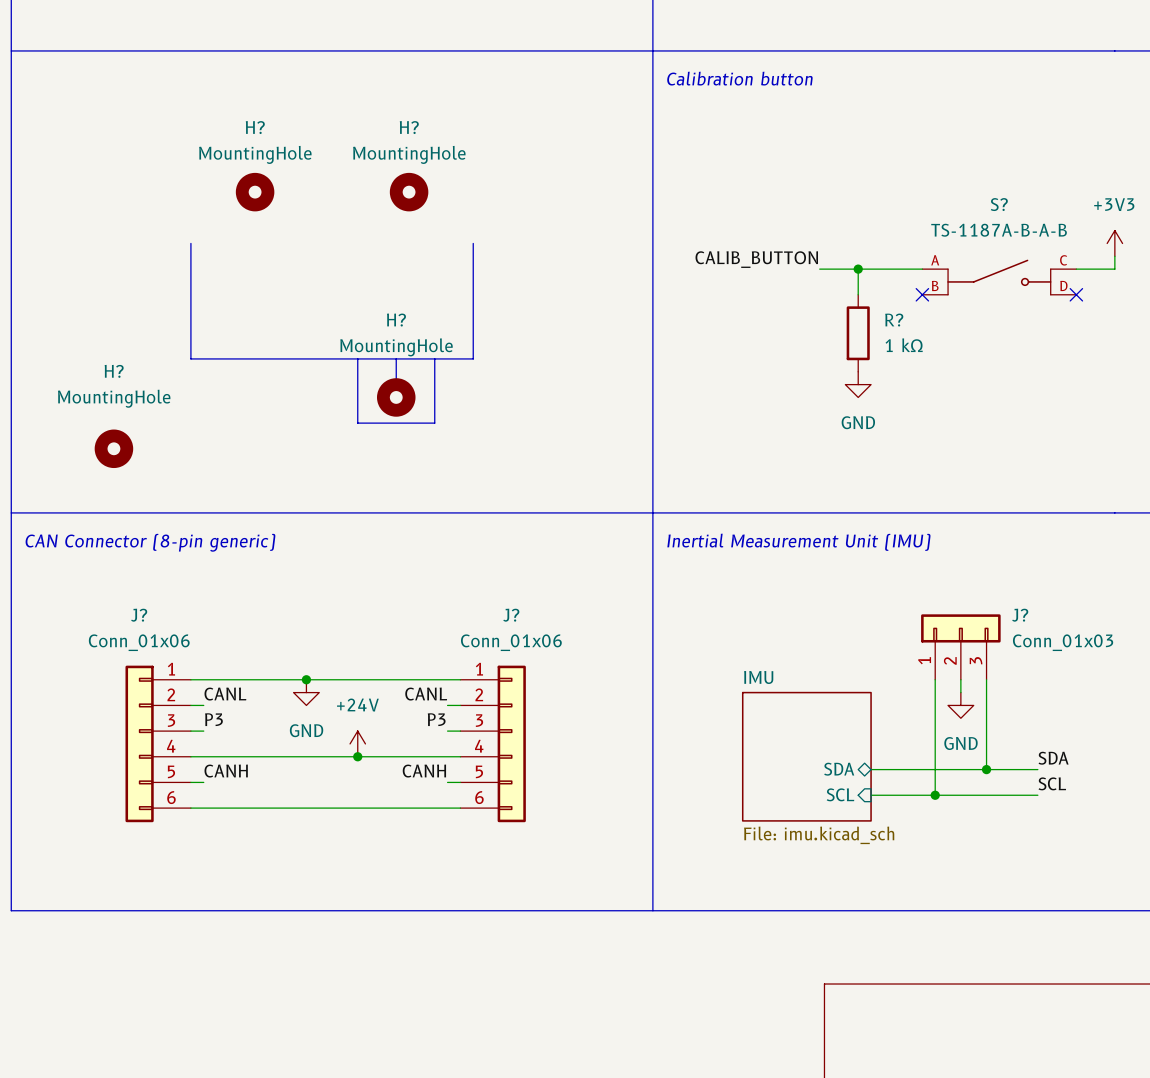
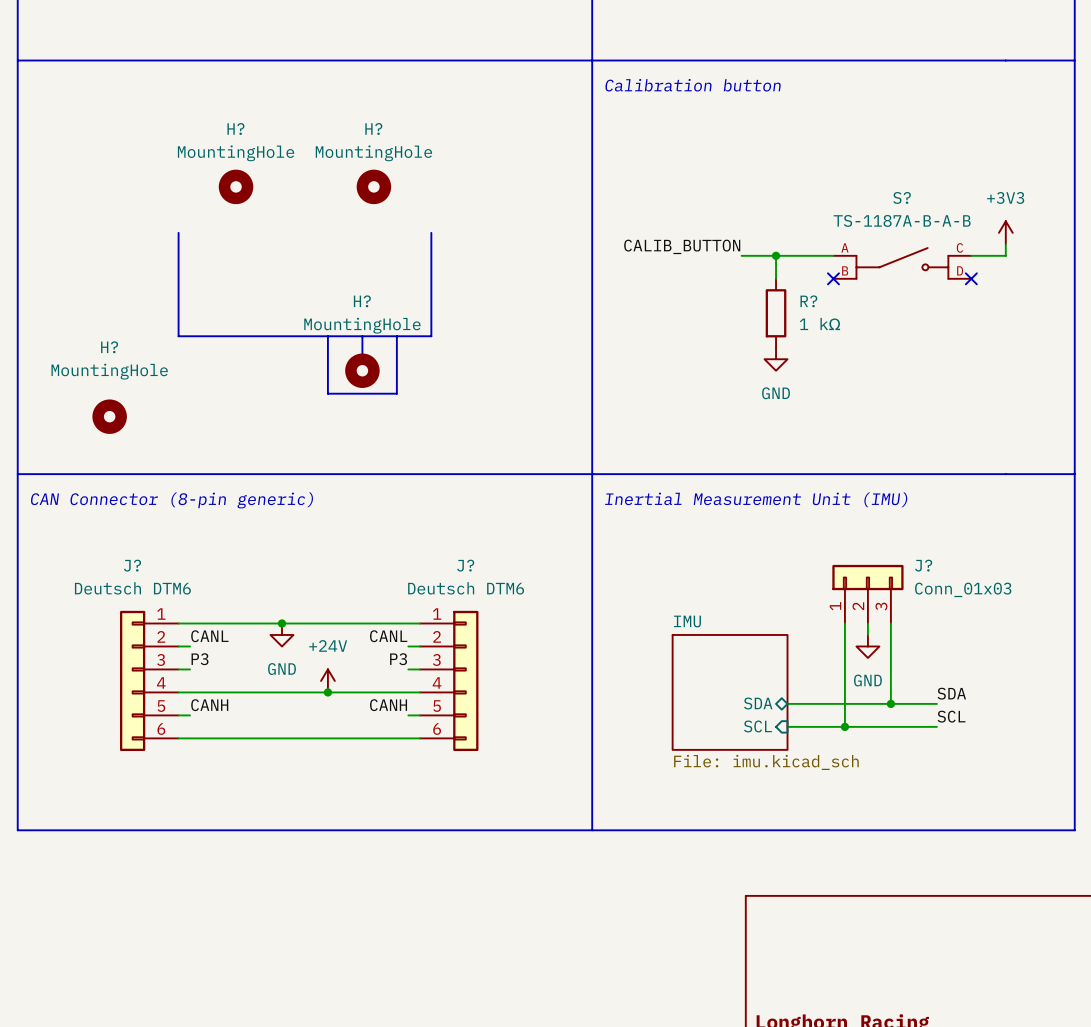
J? value: Conn_01x06 (139, 642) -> Deutsch DTM6 (132, 588)
J? value: Conn_01x06 (511, 642) -> Deutsch DTM6 (466, 588)

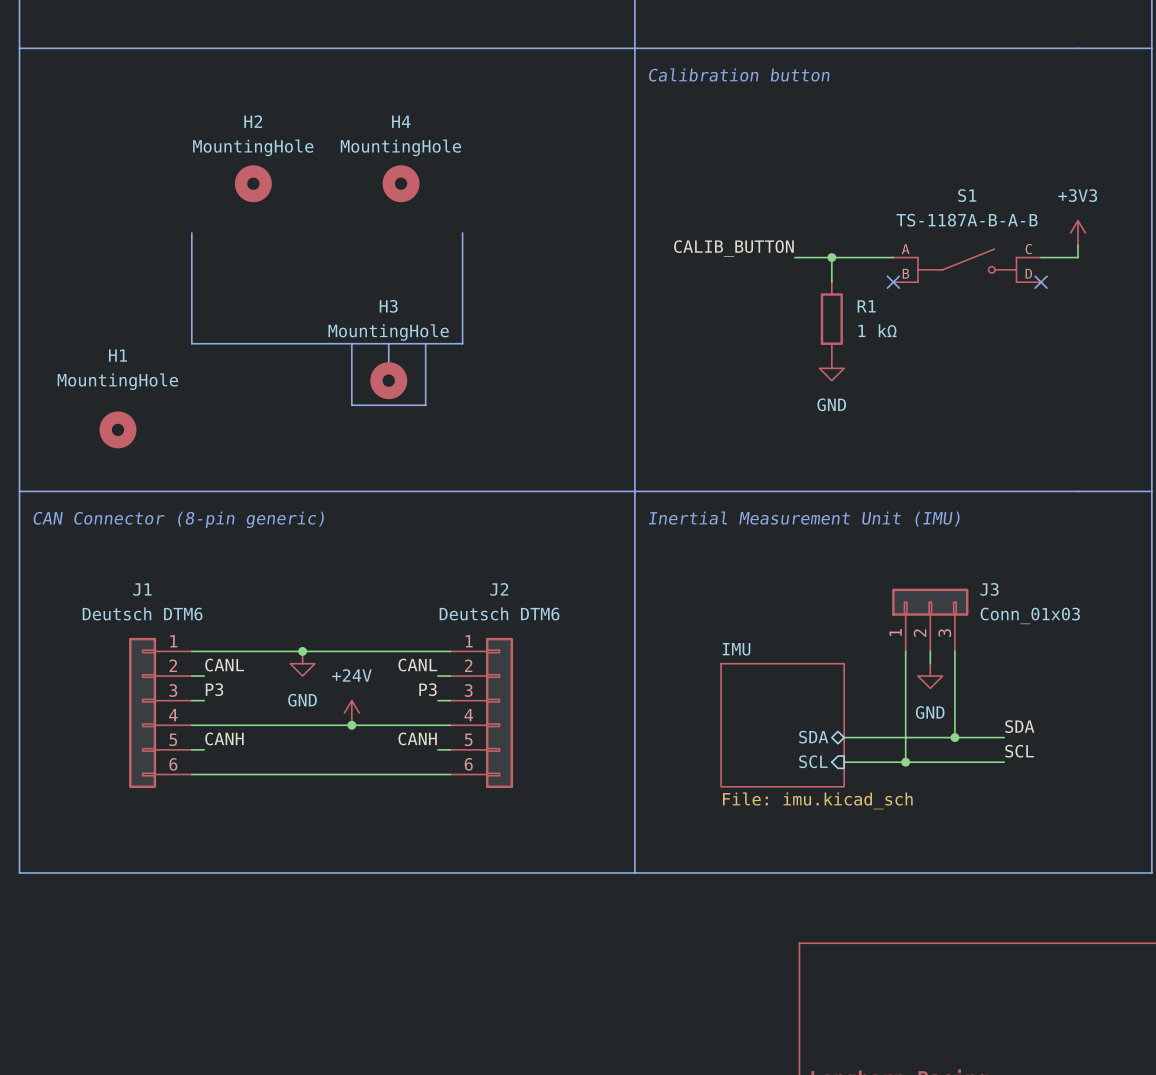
H? name: H? (235, 129) -> H2 (253, 121)
H? name: H? (373, 129) -> H4 (401, 121)
S? name: S? (902, 197) -> S1 (967, 195)
H? name: H? (362, 301) -> H3 (388, 306)
R? name: R? (808, 301) -> R1 (866, 306)
H? name: H? (109, 347) -> H1 (117, 355)
J? name: J? (132, 565) -> J1 (142, 589)
J? name: J? (465, 565) -> J2 (499, 589)
J? name: J? (923, 565) -> J3 (989, 589)

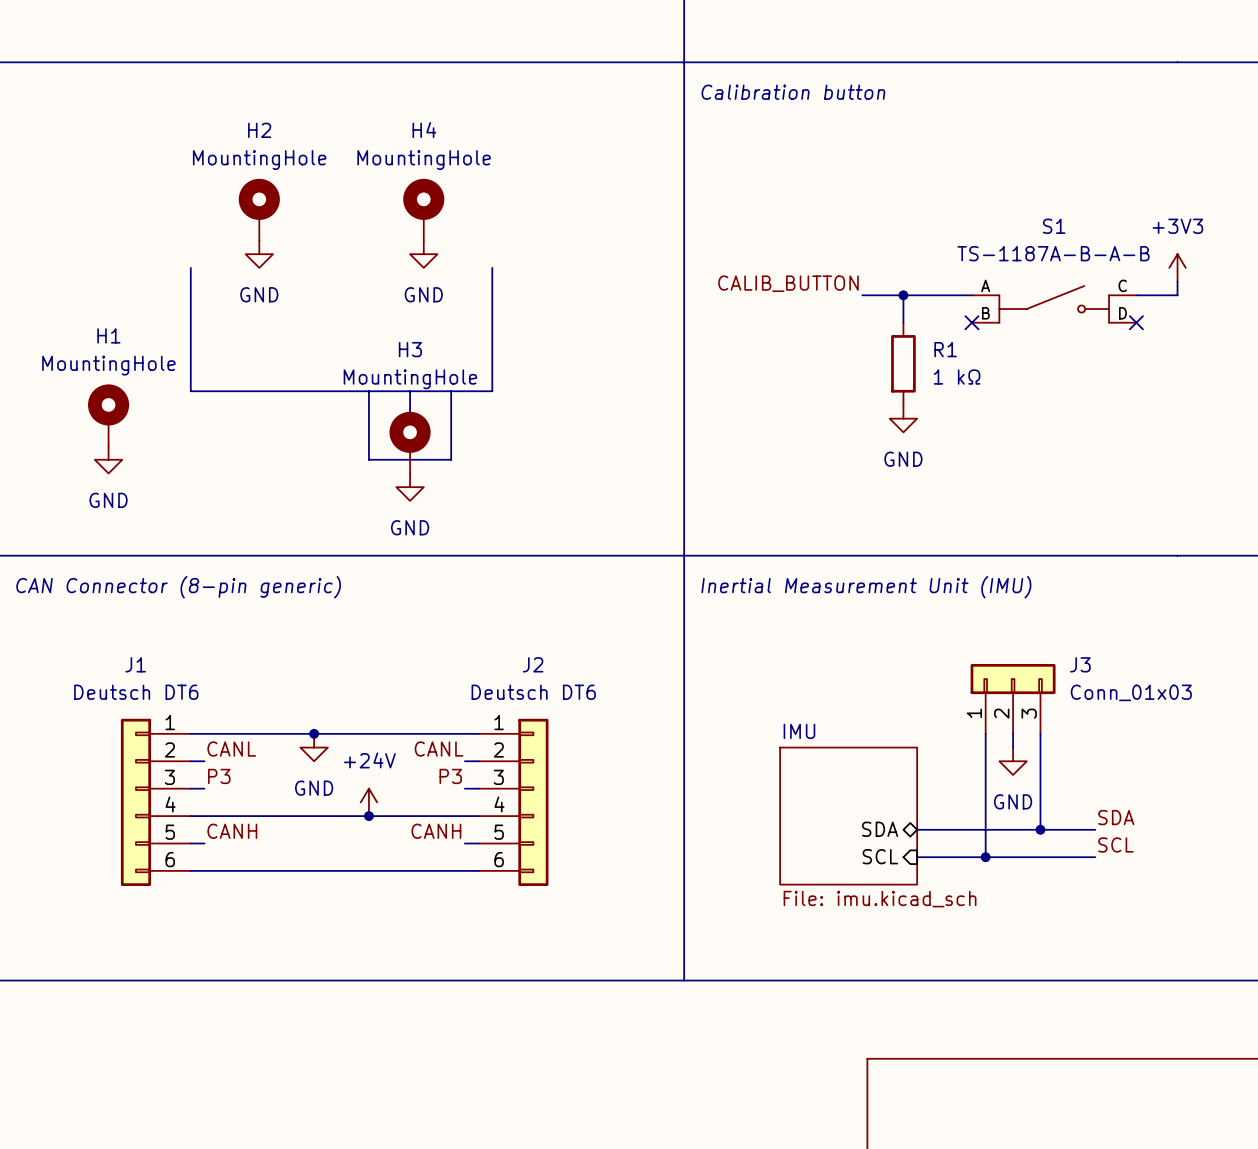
H2 symbol: [234, 165, 272, 203] -> [238, 178, 280, 241]
H4 symbol: [382, 165, 420, 203] -> [403, 178, 445, 241]
power symbol: none -> GND (259, 254)
power symbol: none -> GND (423, 254)
H3 symbol: [370, 362, 408, 400] -> [389, 411, 431, 474]
power symbol: none -> GND (108, 459)
H1 symbol: [99, 411, 137, 449] -> [88, 384, 130, 447]
power symbol: none -> GND (410, 487)
J1 value: Deutsch DTM6 (142, 613) -> Deutsch DT6 (136, 692)
J2 value: Deutsch DTM6 (499, 613) -> Deutsch DT6 (533, 692)

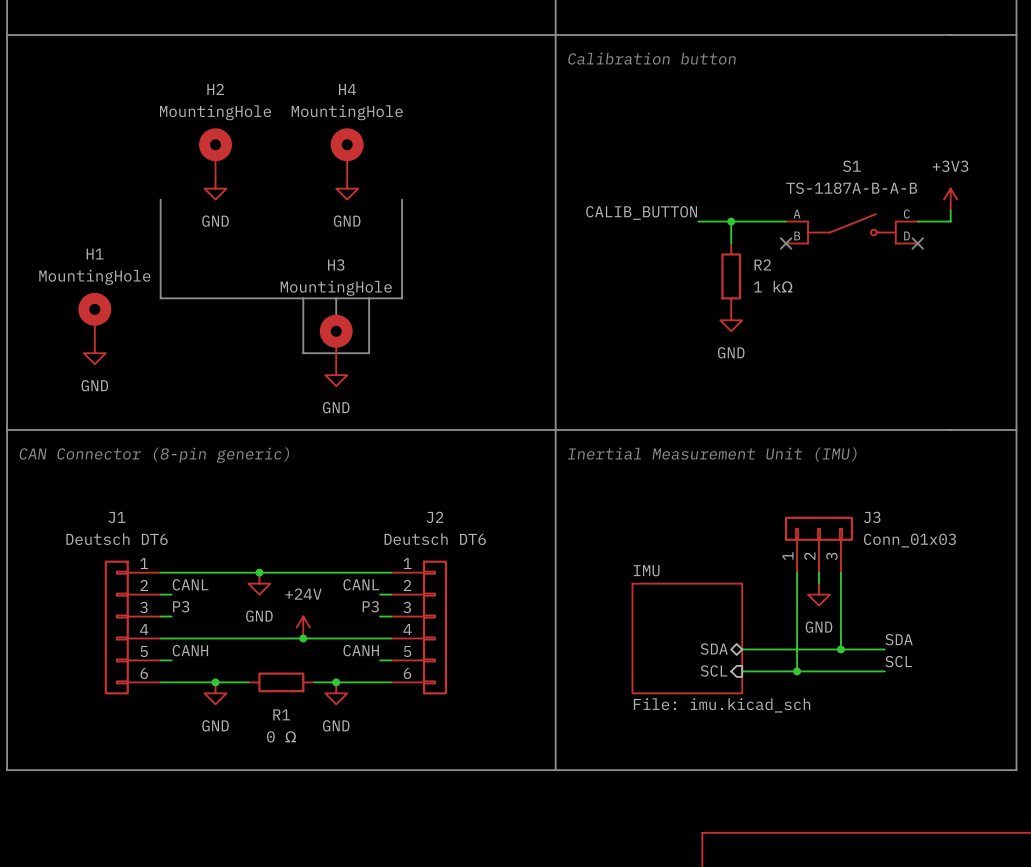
R1 name: R1 (945, 349) -> R2 (762, 264)
junction: none -> (215, 682)
wire: (300, 870) (382, 870) -> none
R1: none -> 0 Ω (281, 682)
junction: none -> (336, 682)
power symbol: none -> GND (215, 693)
power symbol: none -> GND (336, 693)

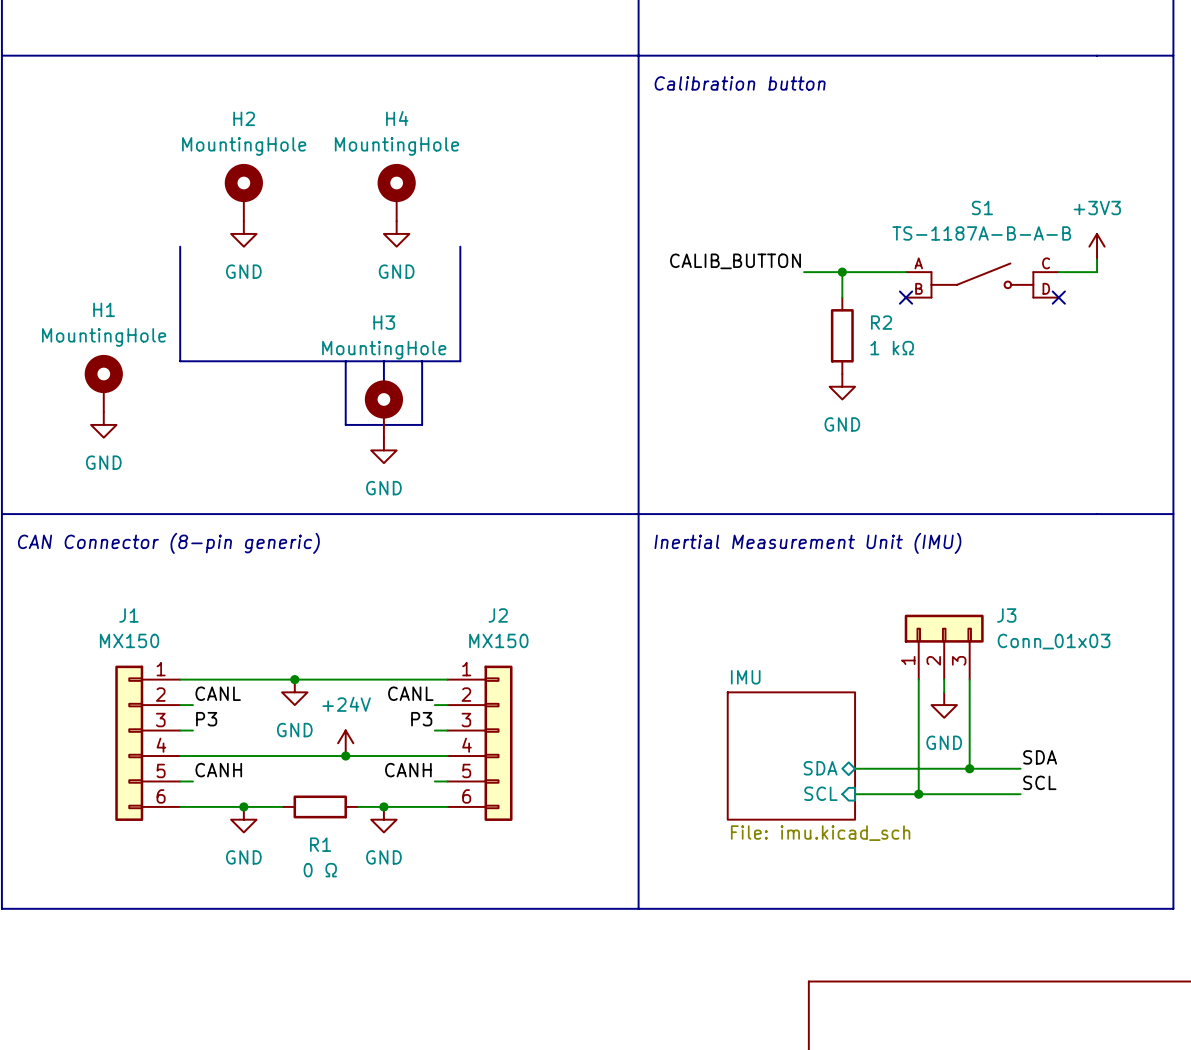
J1 value: Deutsch DT6 (117, 539) -> MX150 (129, 640)
J2 value: Deutsch DT6 (435, 539) -> MX150 (498, 640)

